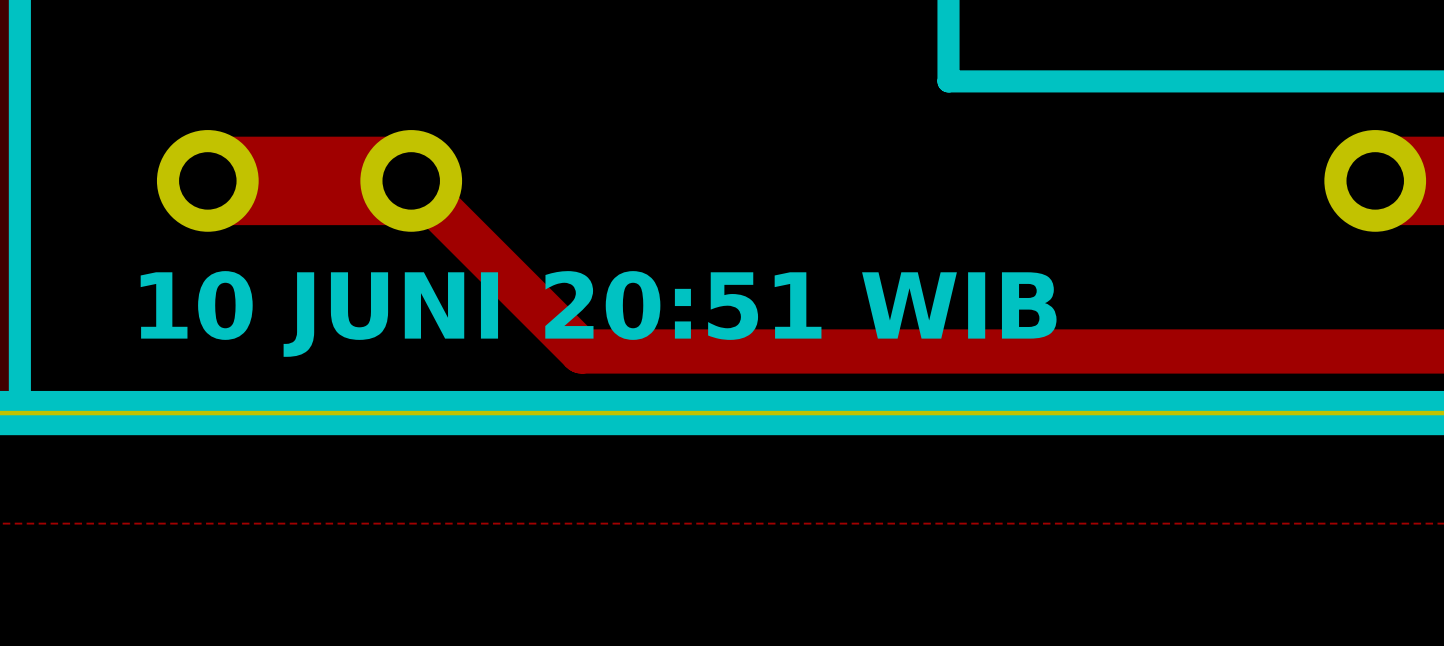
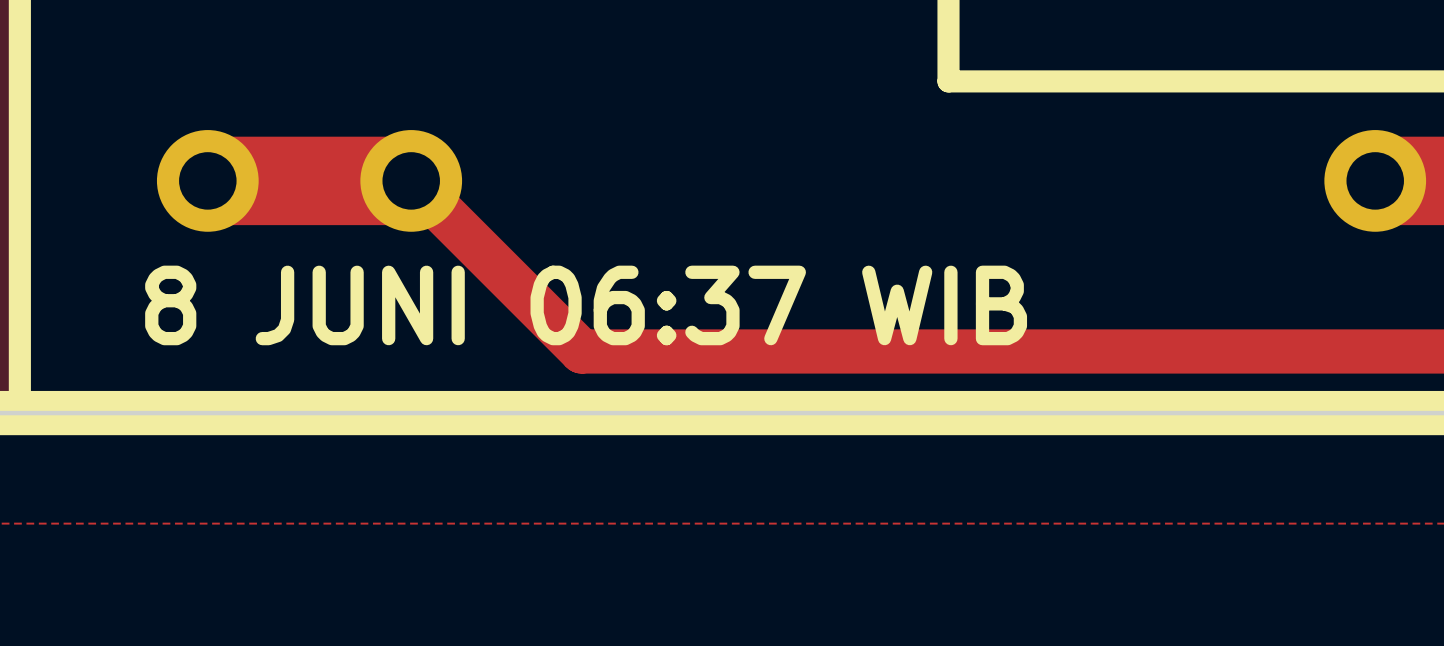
text: 10 JUNI 20:51 WIB (598, 313) -> 8 JUNI 06:37 WIB (586, 305)

